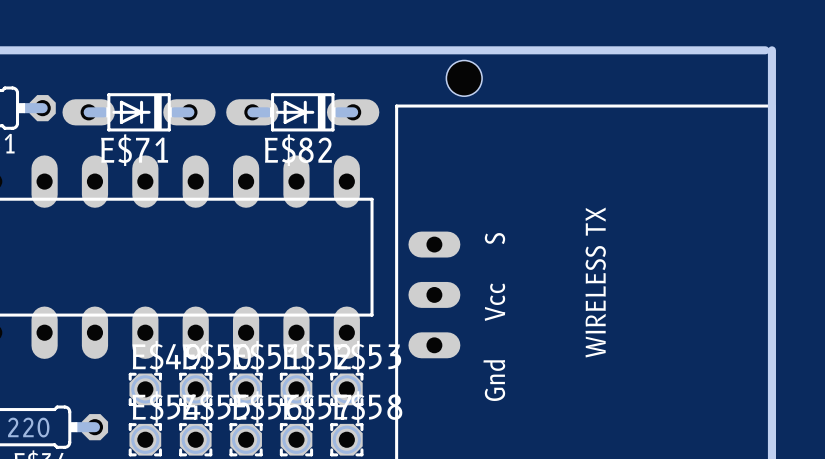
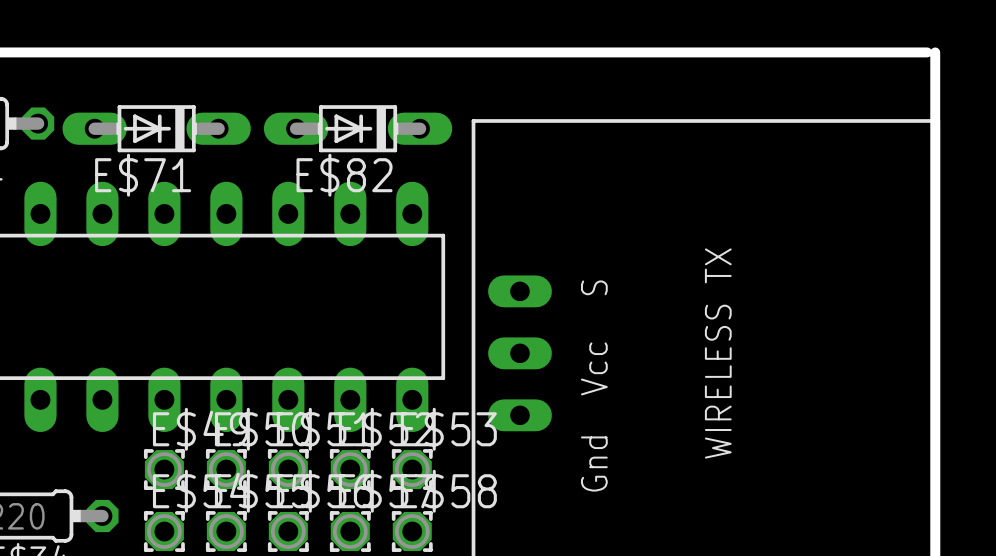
hole: (464, 78) -> none

